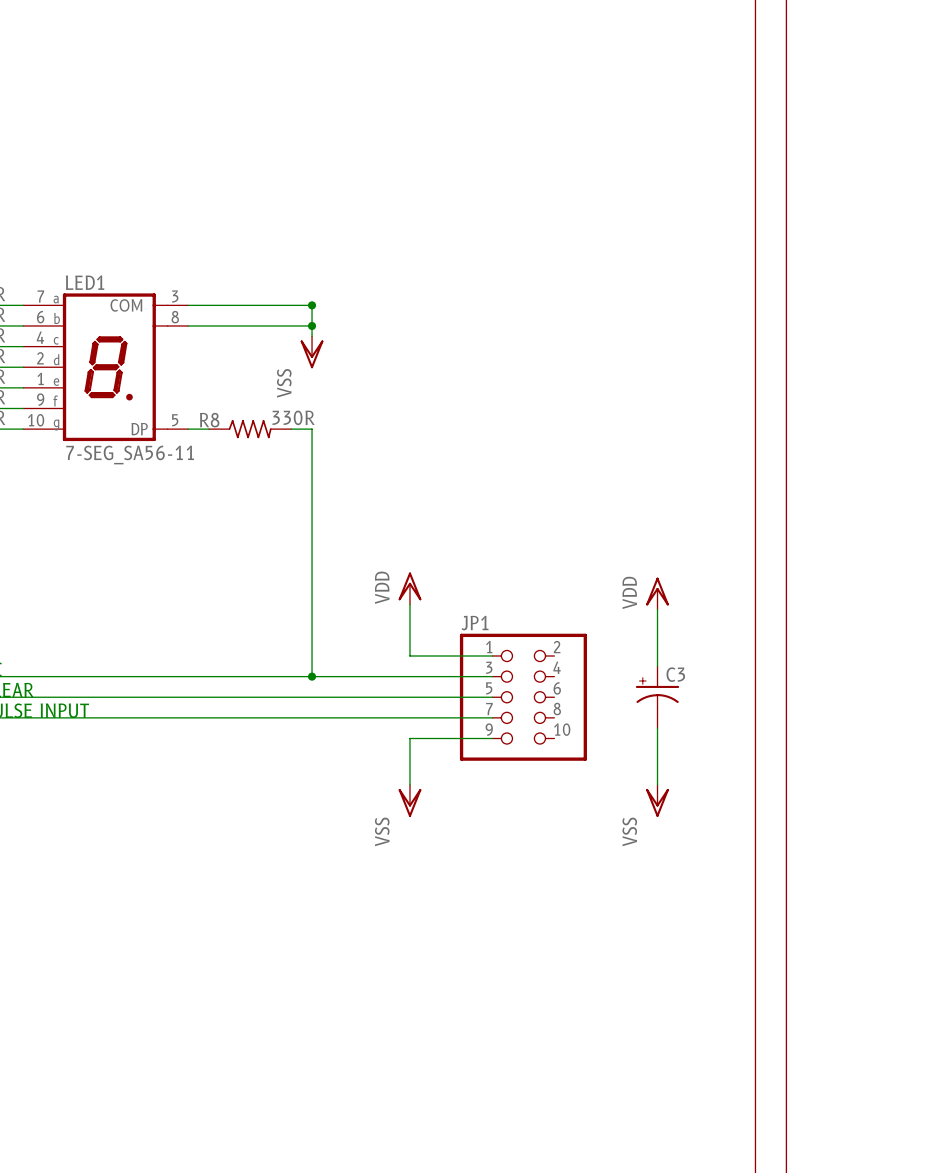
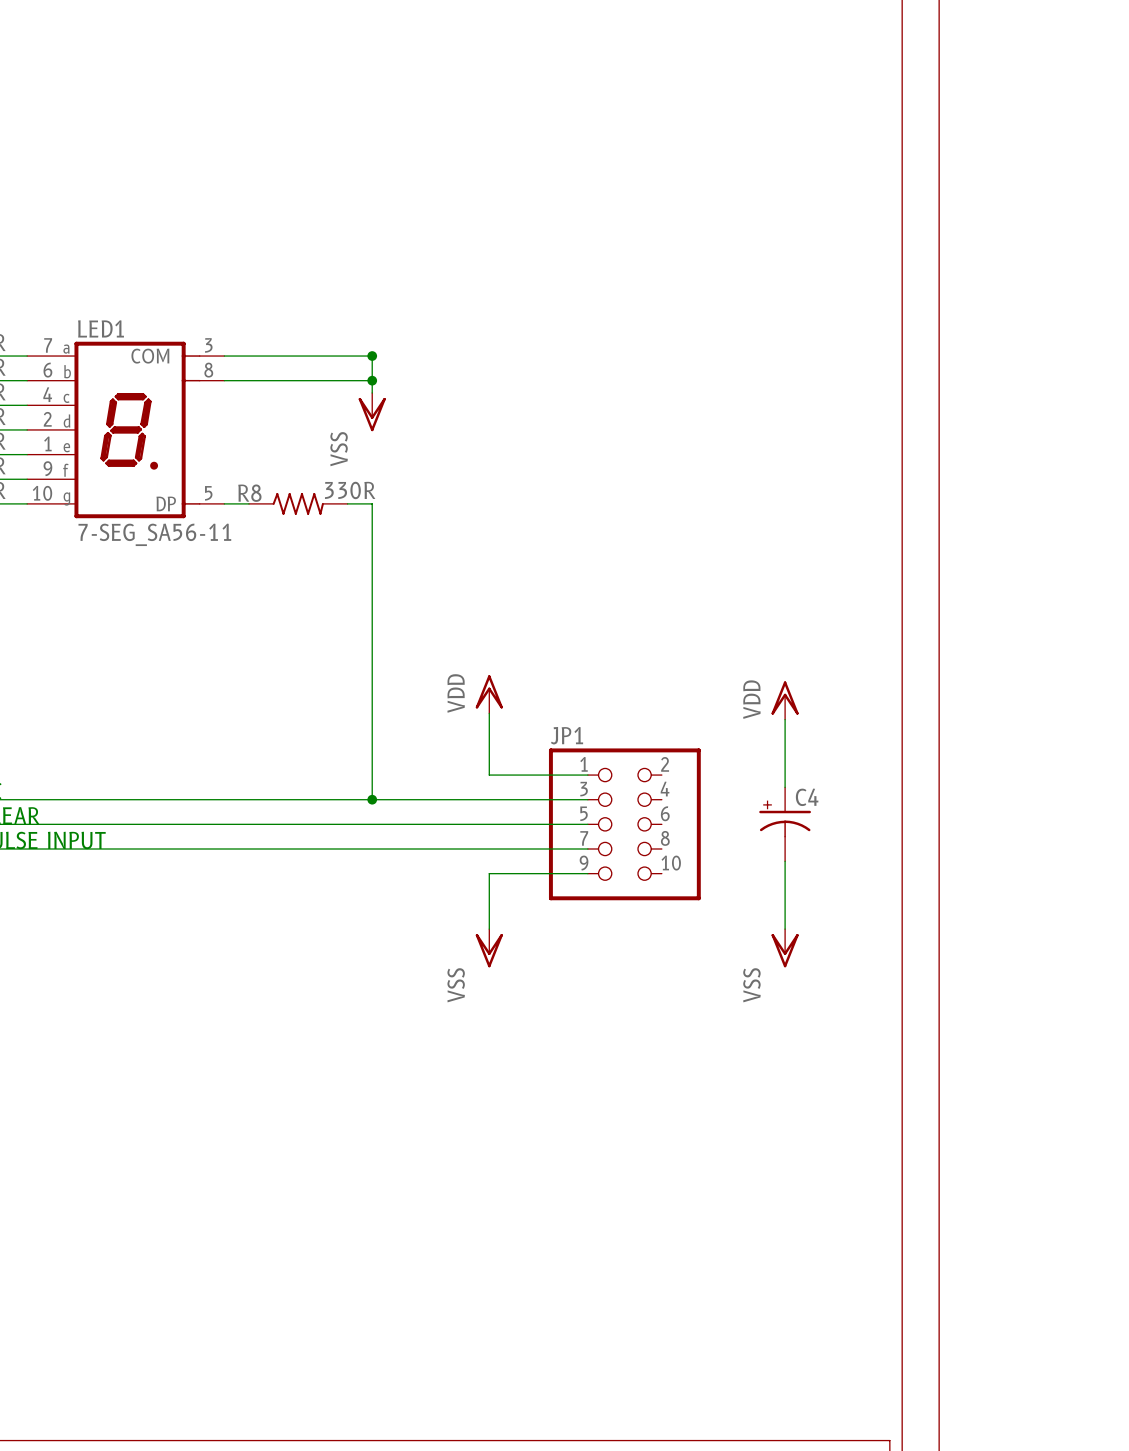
C3 name: C3 (675, 674) -> C4 (807, 797)

